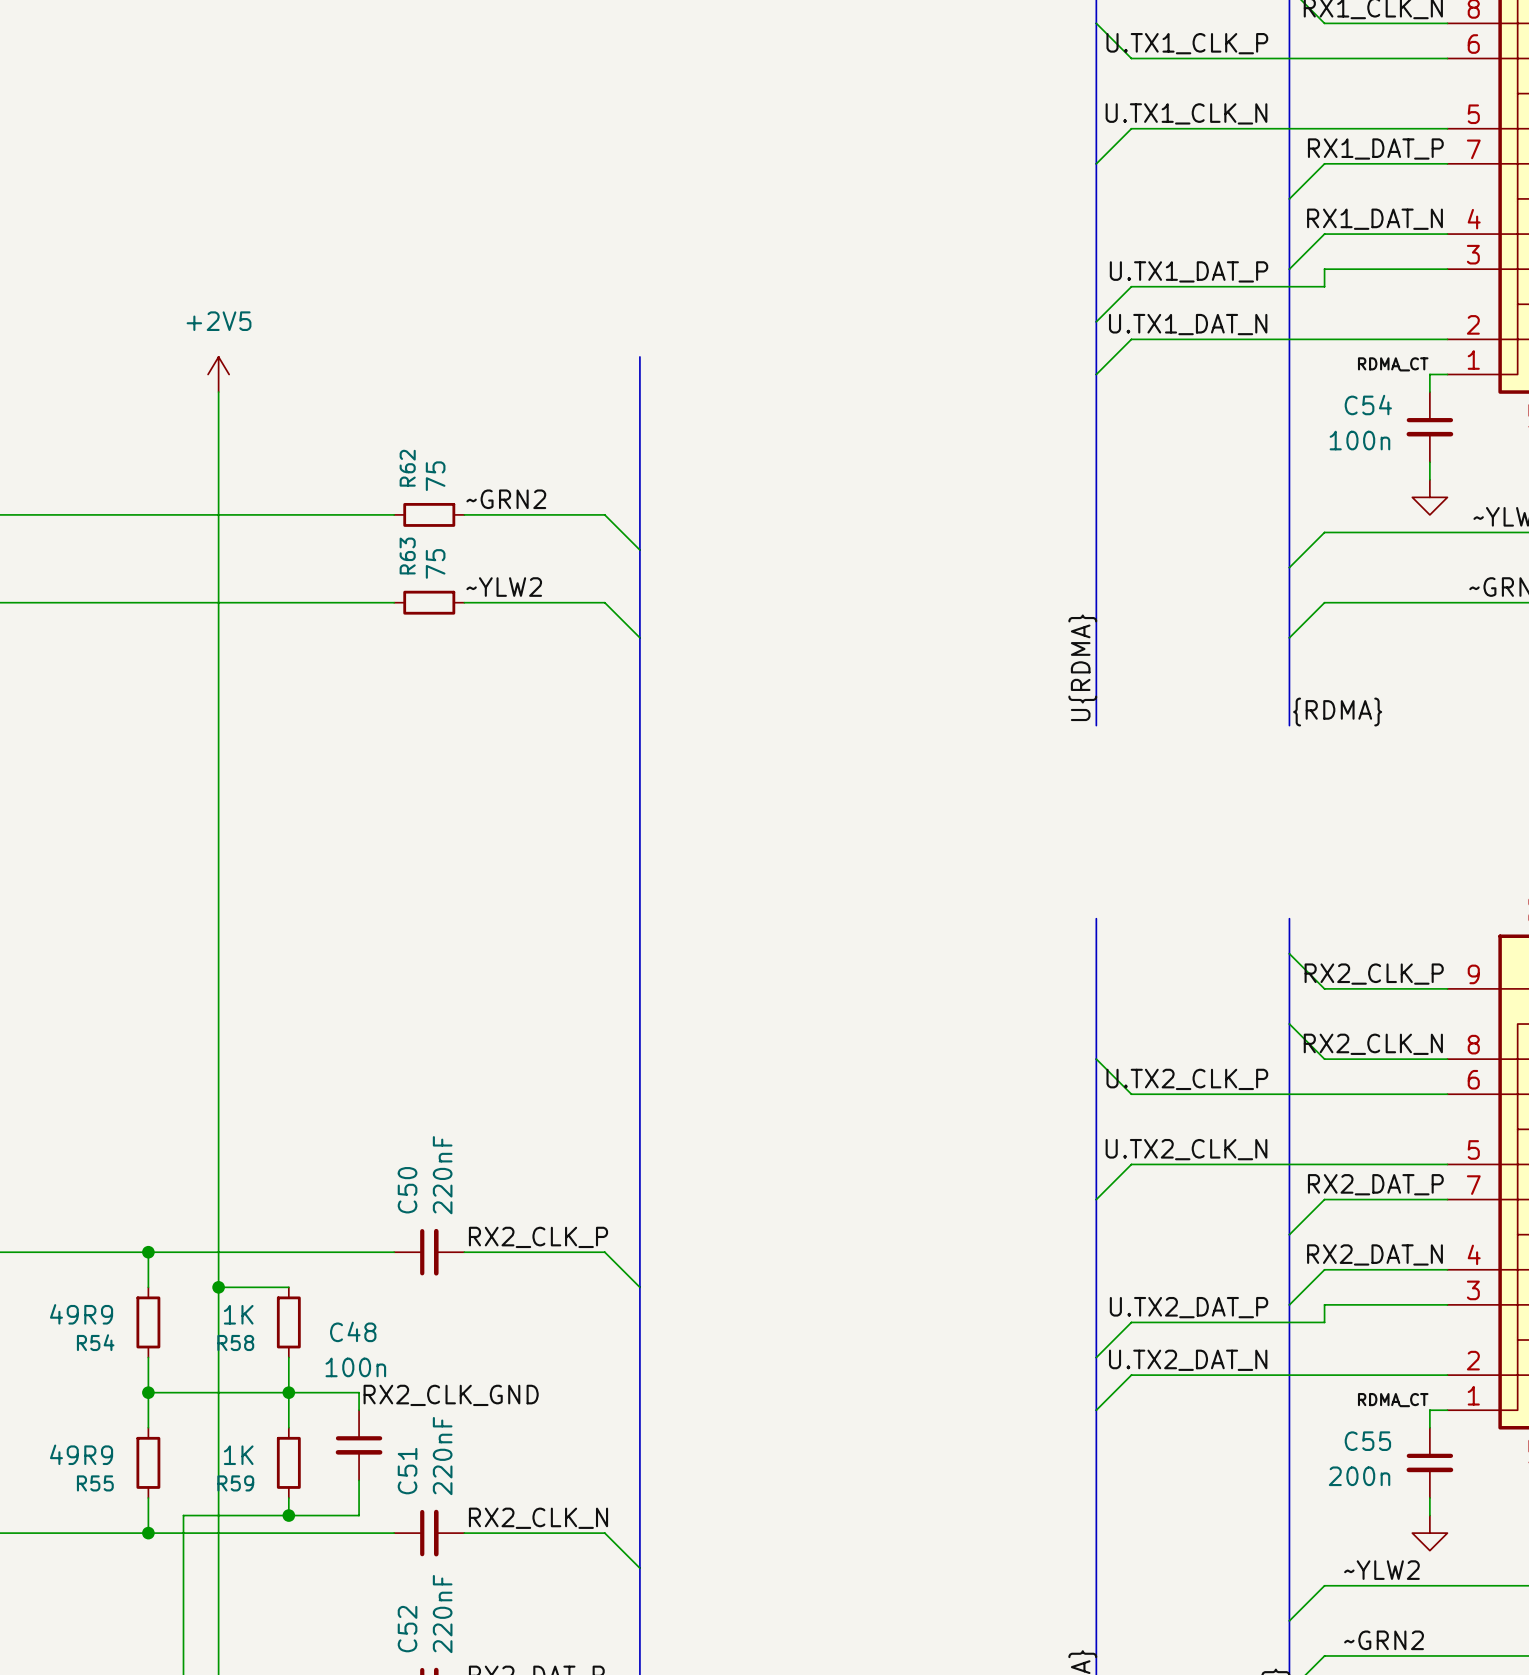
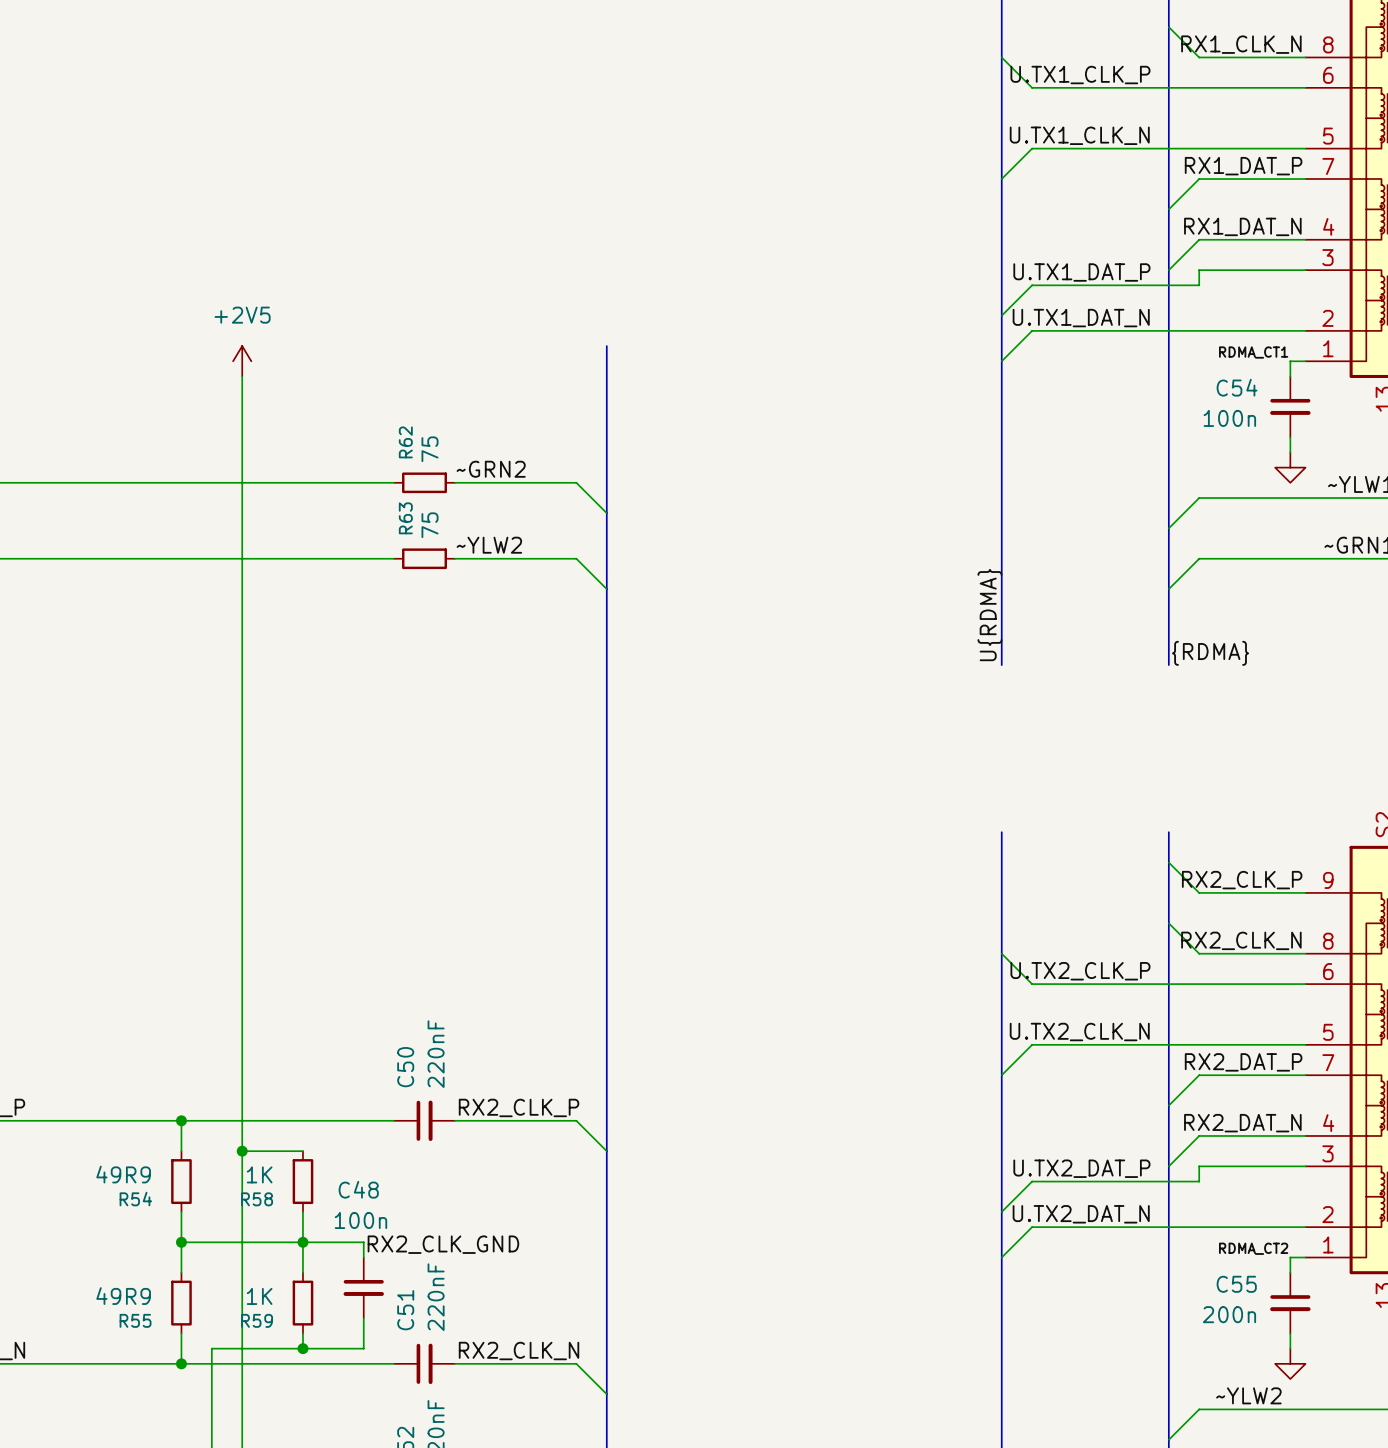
label: RDMA_CT (1393, 364) -> RDMA_CT1 (1253, 352)
label: RDMA_CT (1393, 1400) -> RDMA_CT2 (1253, 1248)

